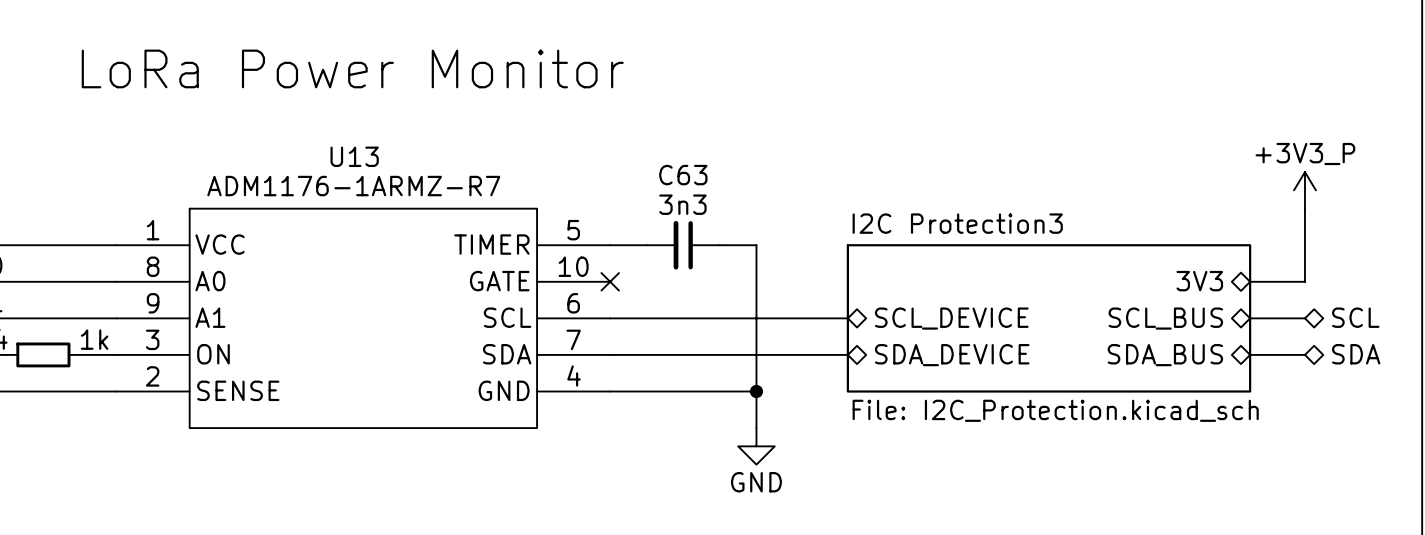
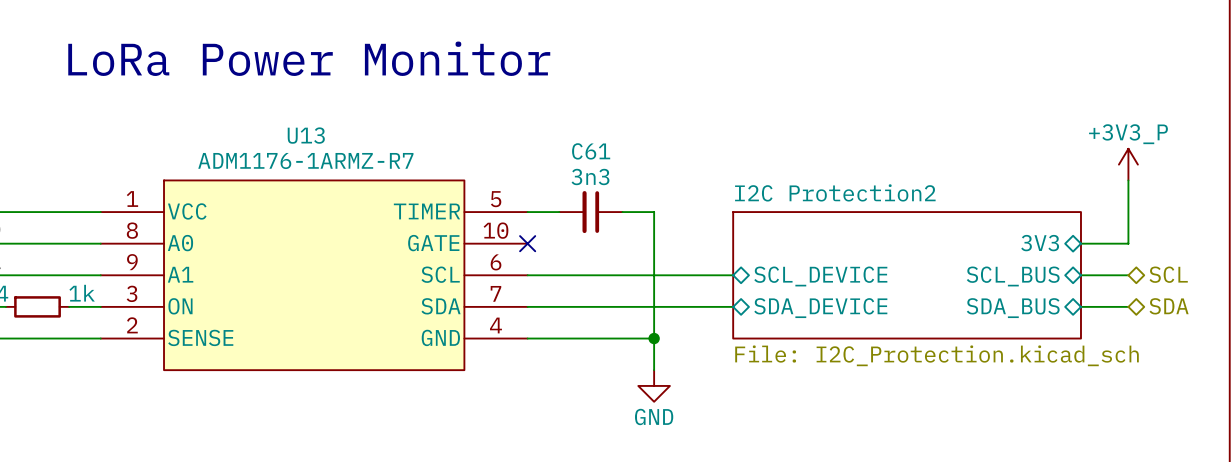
C63 name: C63 (683, 175) -> C61 (591, 151)
sheet I2C Protection3 name: I2C Protection3 (957, 223) -> I2C Protection2 (835, 192)

